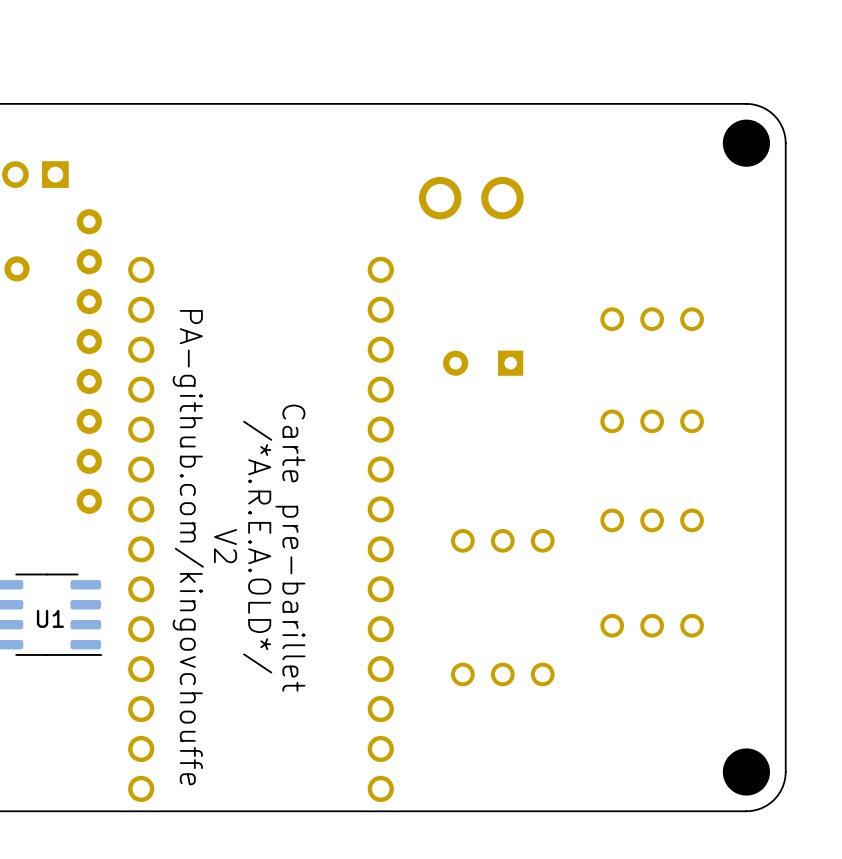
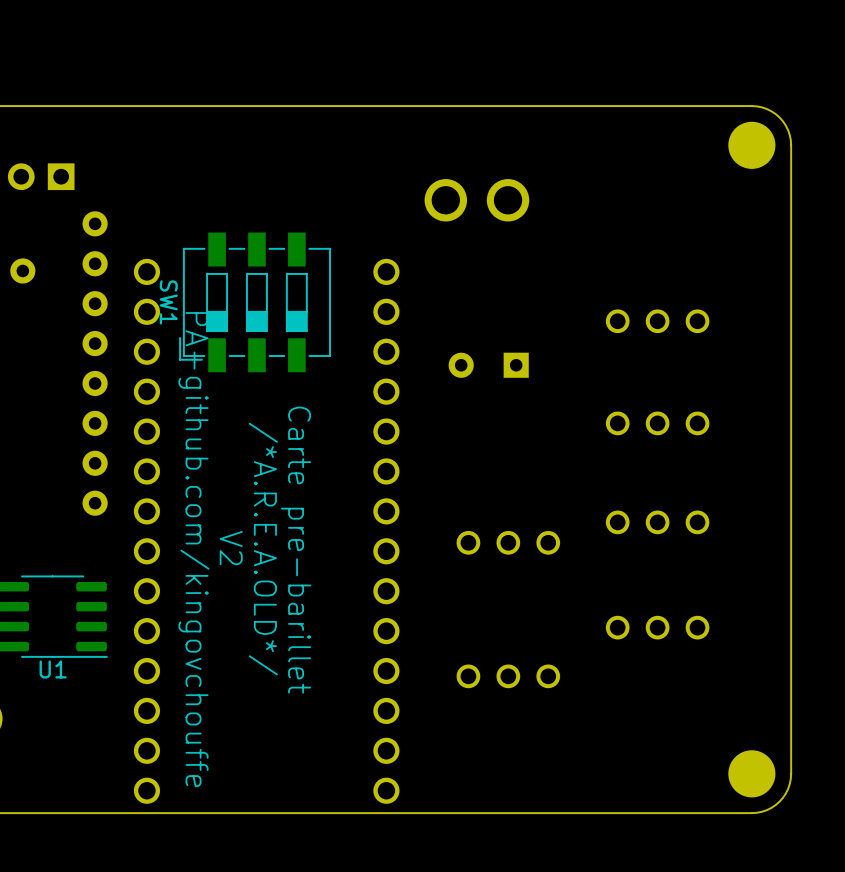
SW1: none -> (255, 302)
U1 name position: U1 (50, 618) -> U1 (53, 669)

